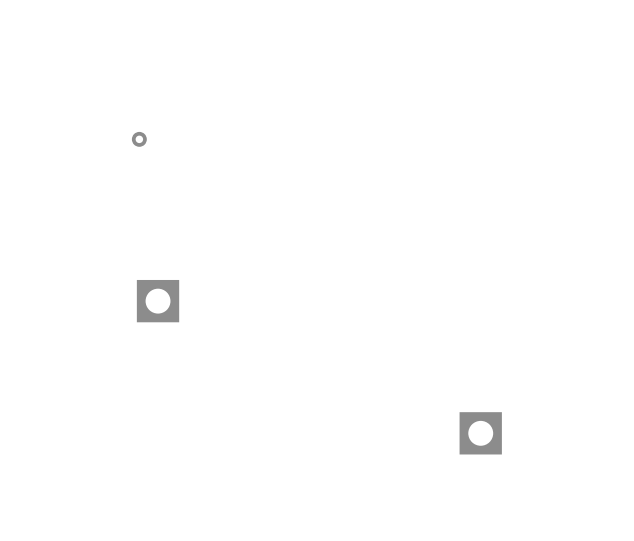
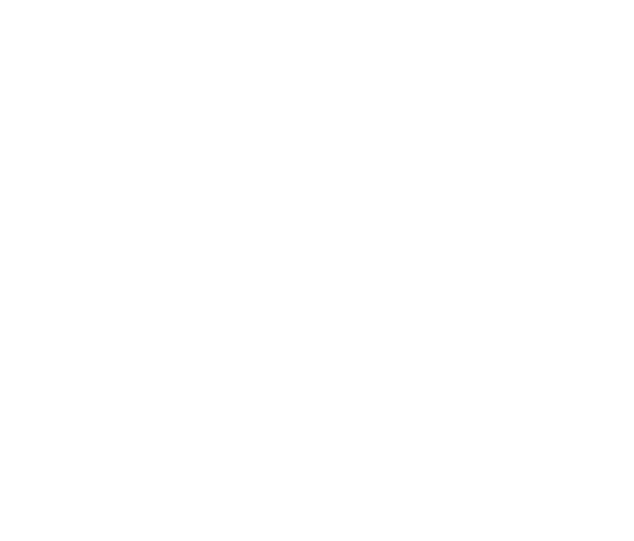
via: (139, 139) -> none
part: (158, 301) -> none
part: (480, 433) -> none

